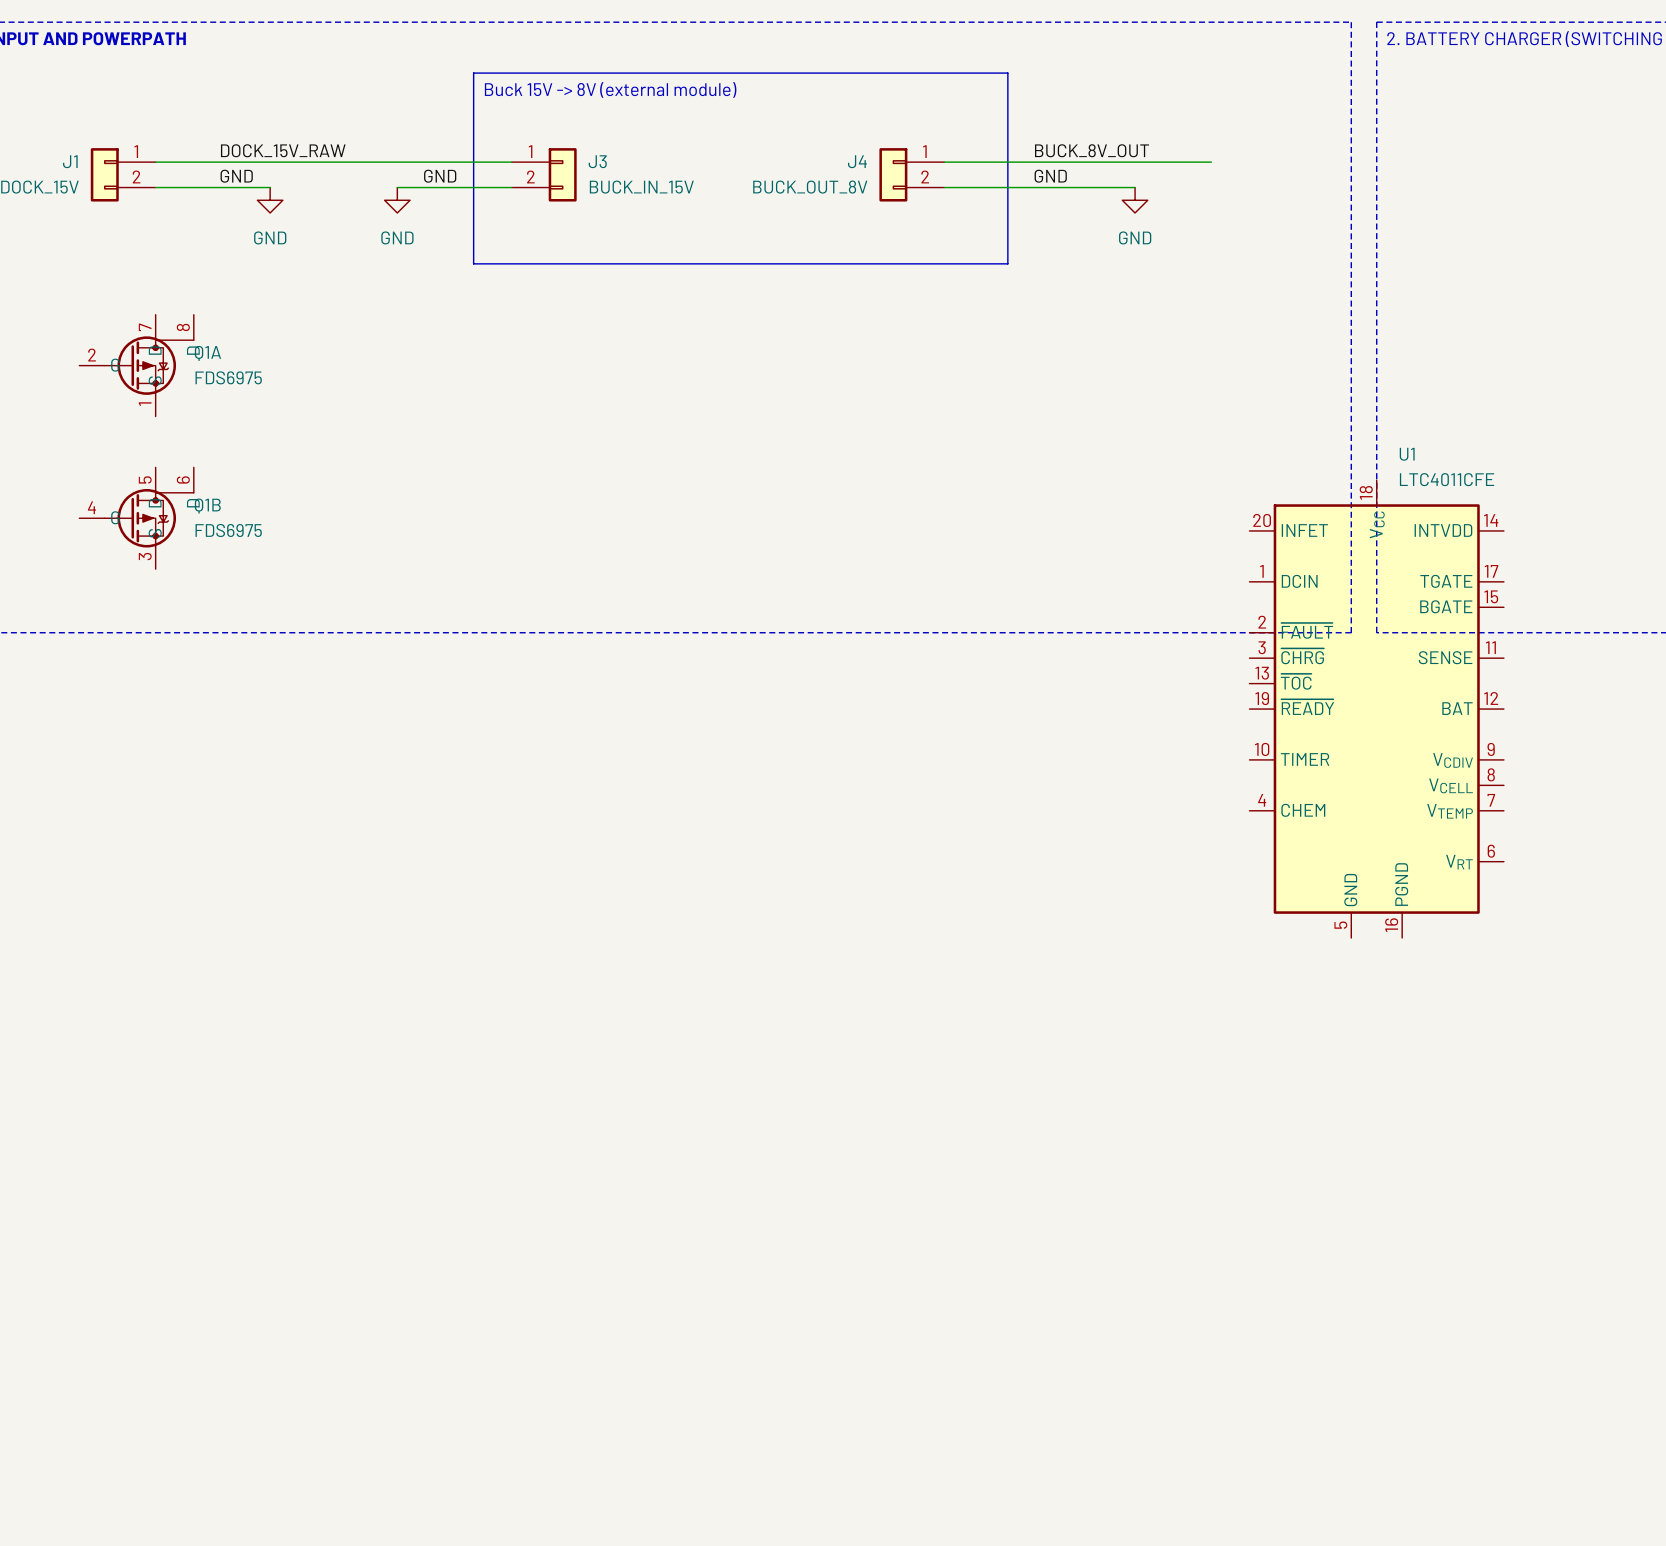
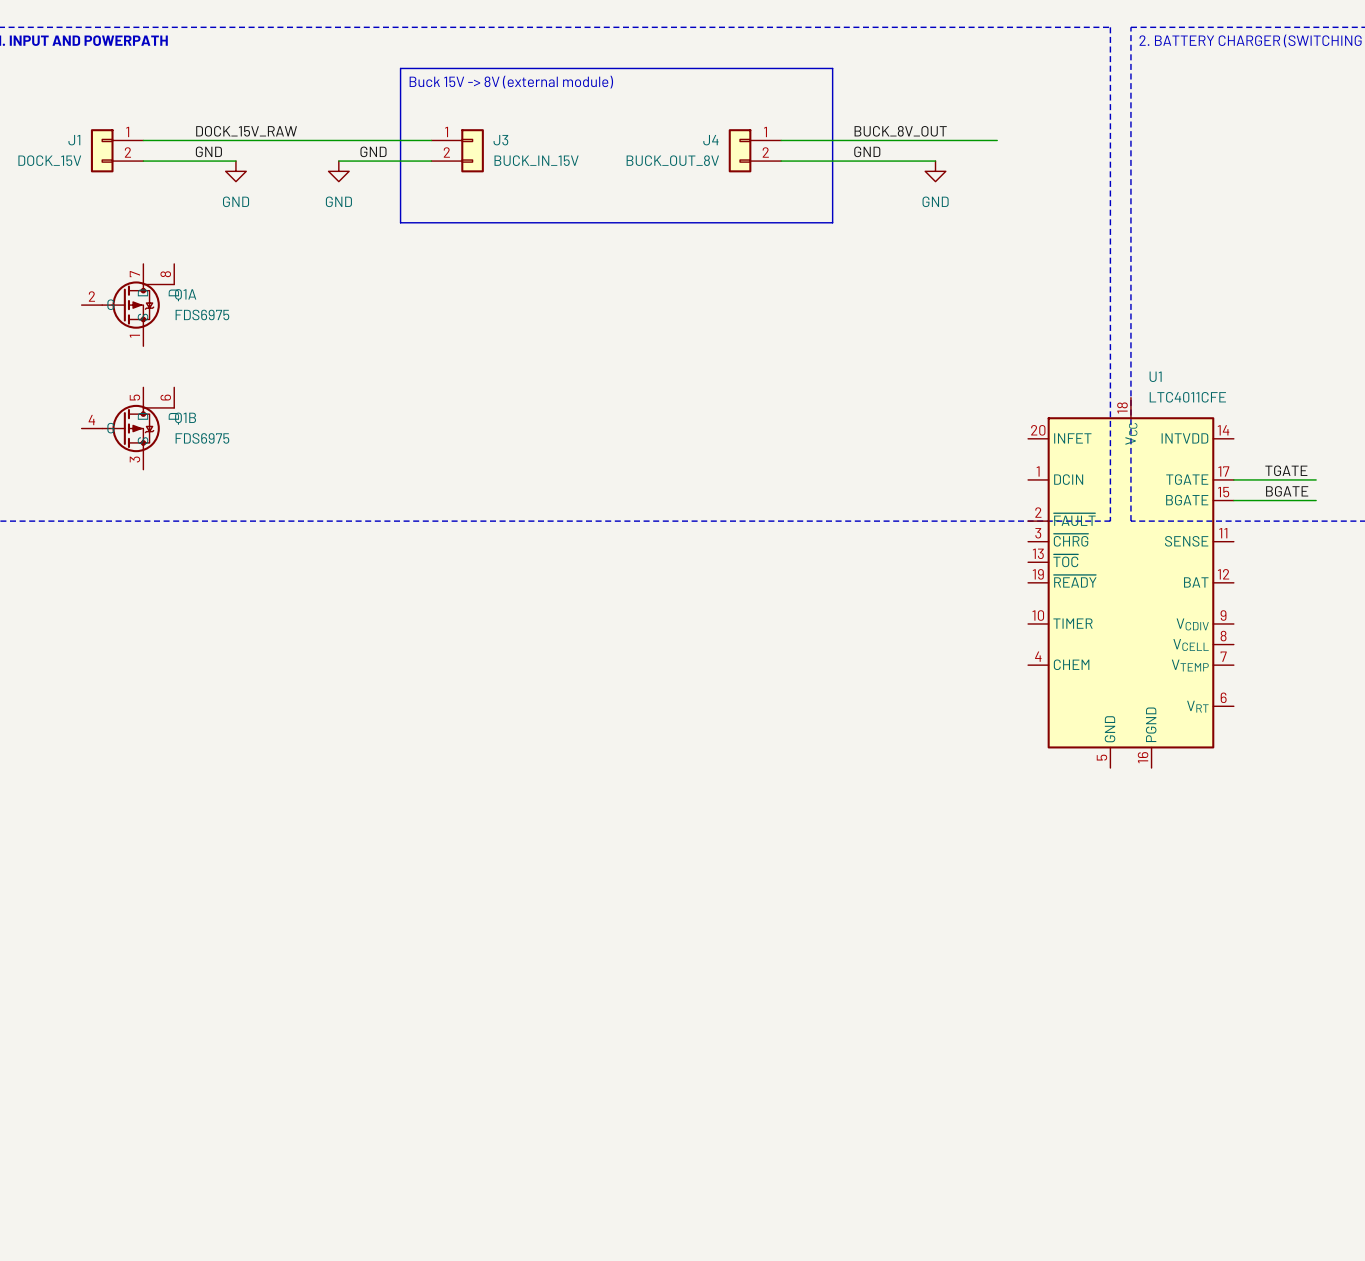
label: none -> TGATE (1286, 470)
wire: none -> (1233, 479) (1316, 479)
label: none -> BGATE (1287, 491)
wire: none -> (1233, 500) (1316, 500)

